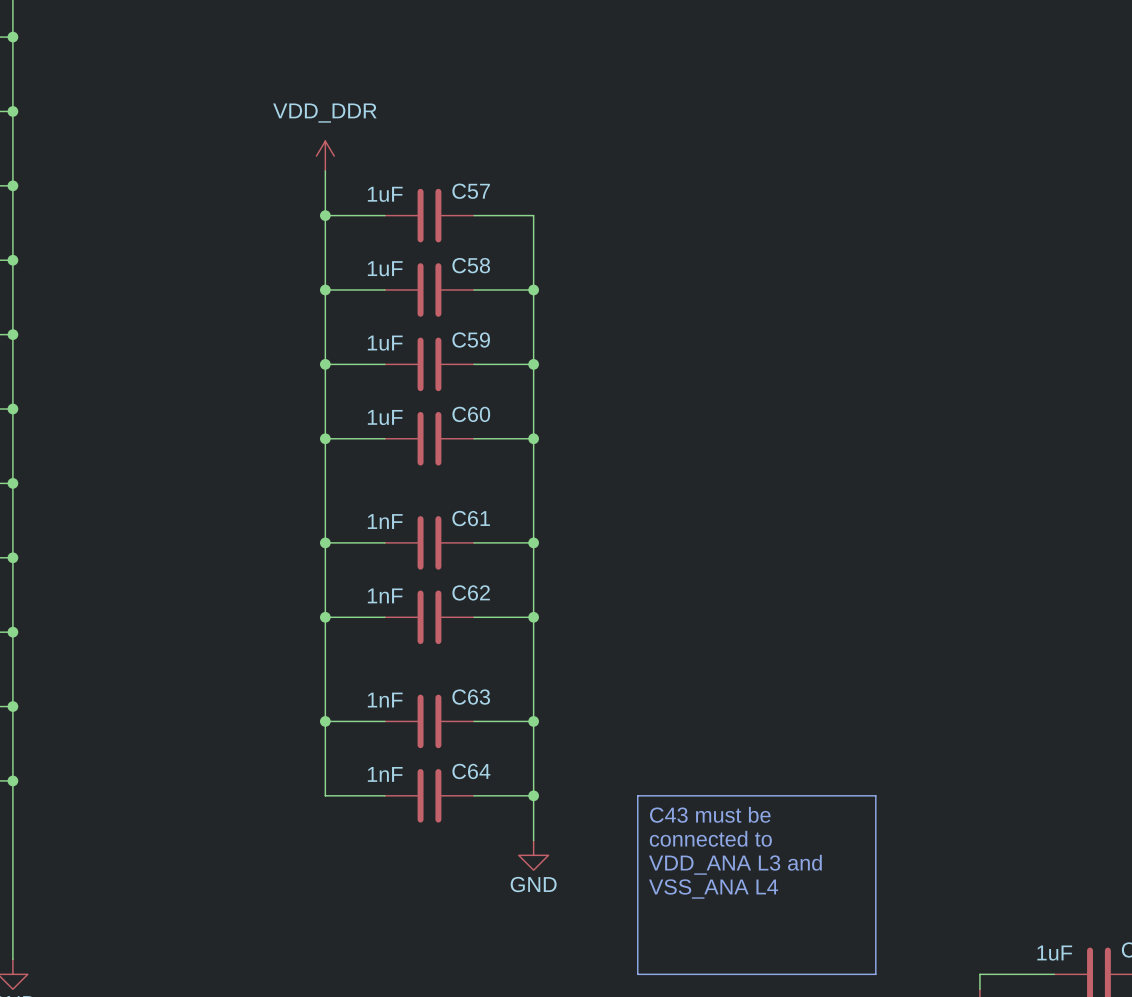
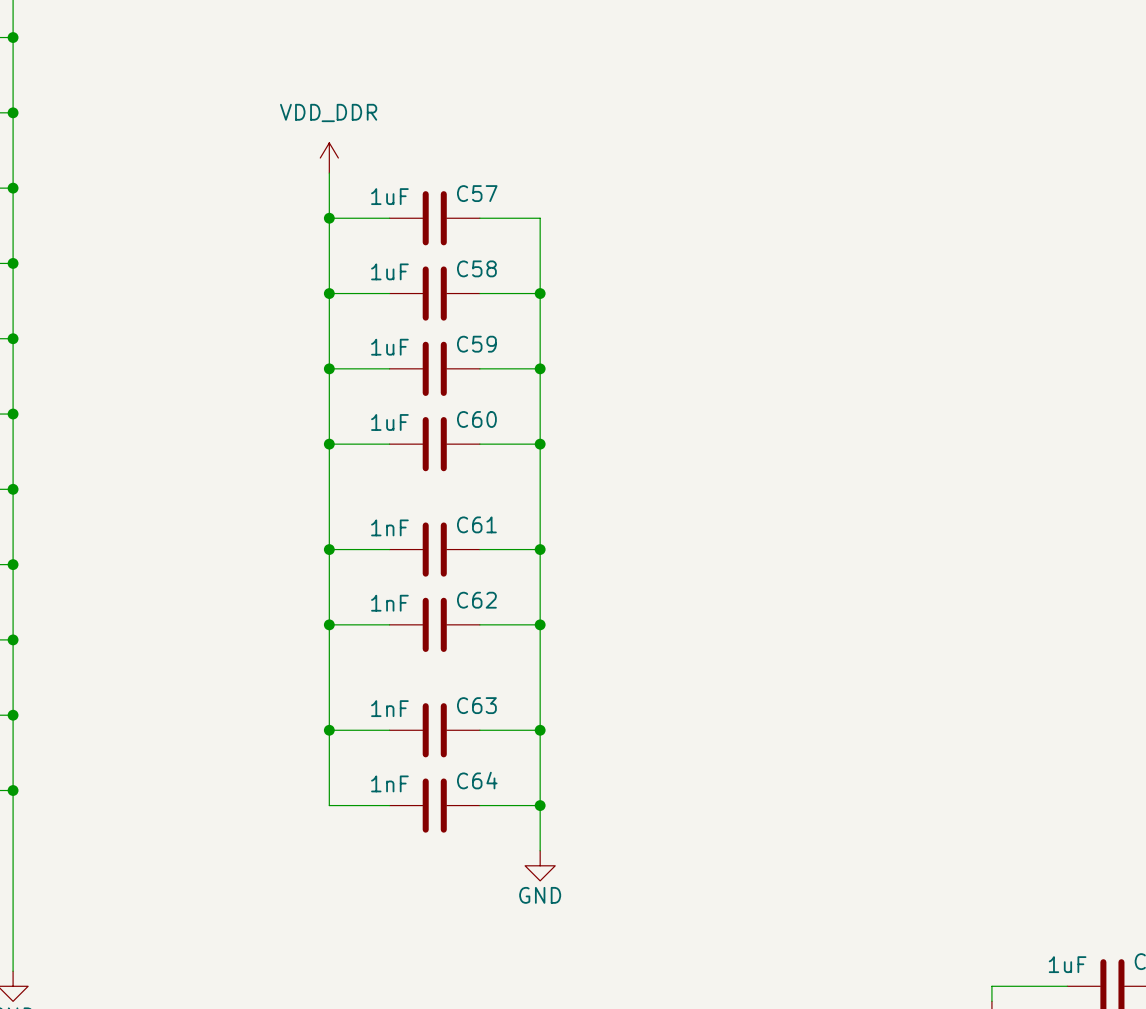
line: (637, 795) (875, 795) (875, 974) (637, 974) (637, 795) -> none
text: C43 must be (710, 814) -> none
text: connected to (710, 838) -> none
text: VDD_ANA L3 and (735, 864) -> none
text: VSS_ANA L4 (713, 889) -> none

